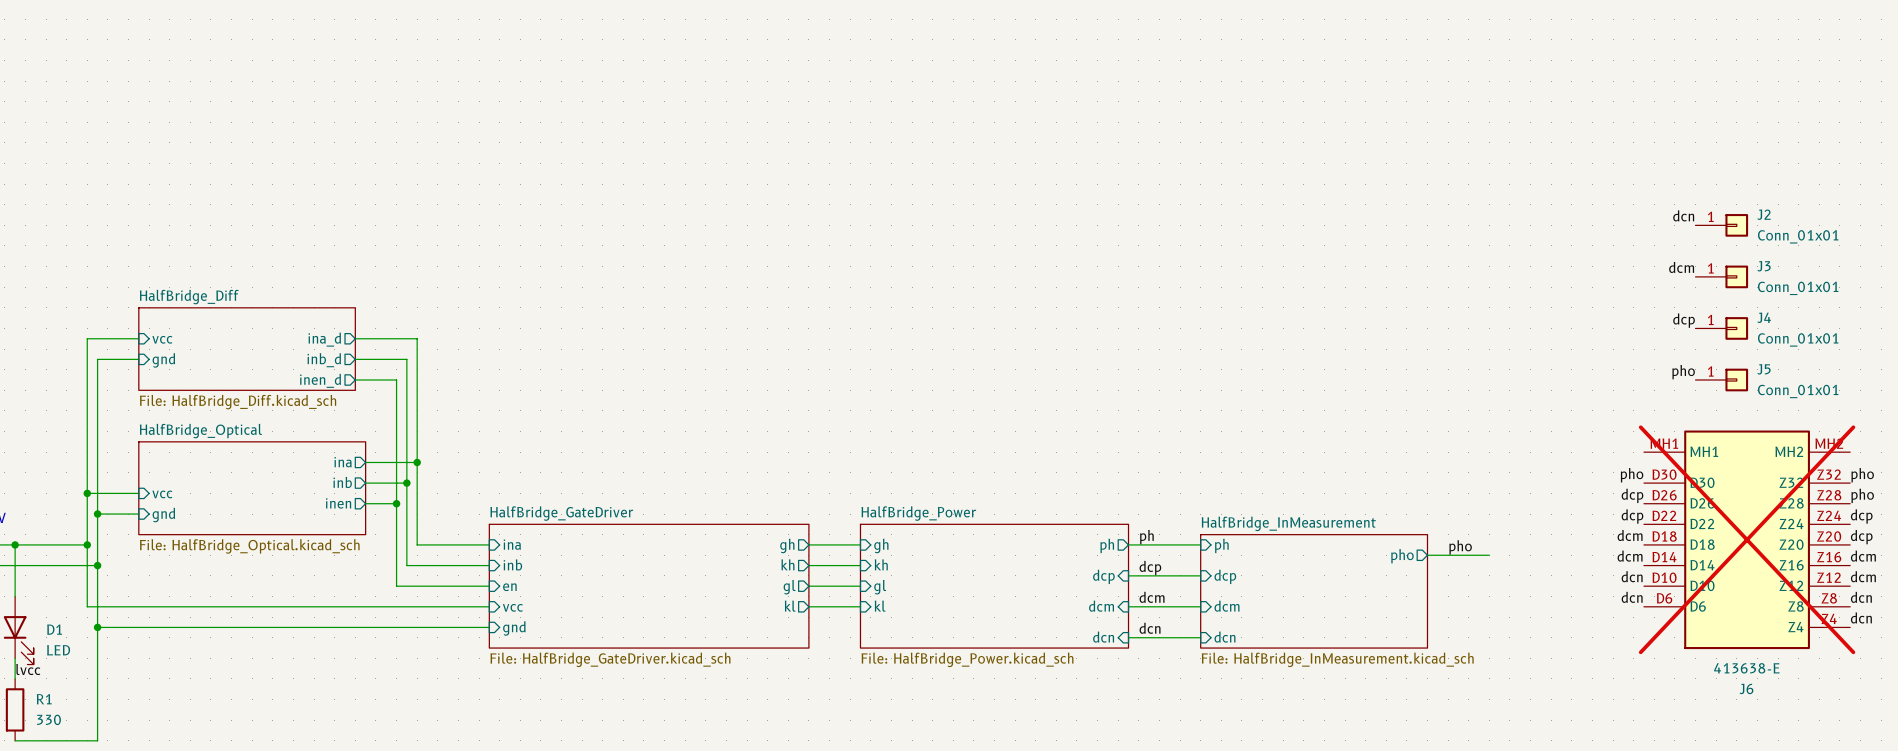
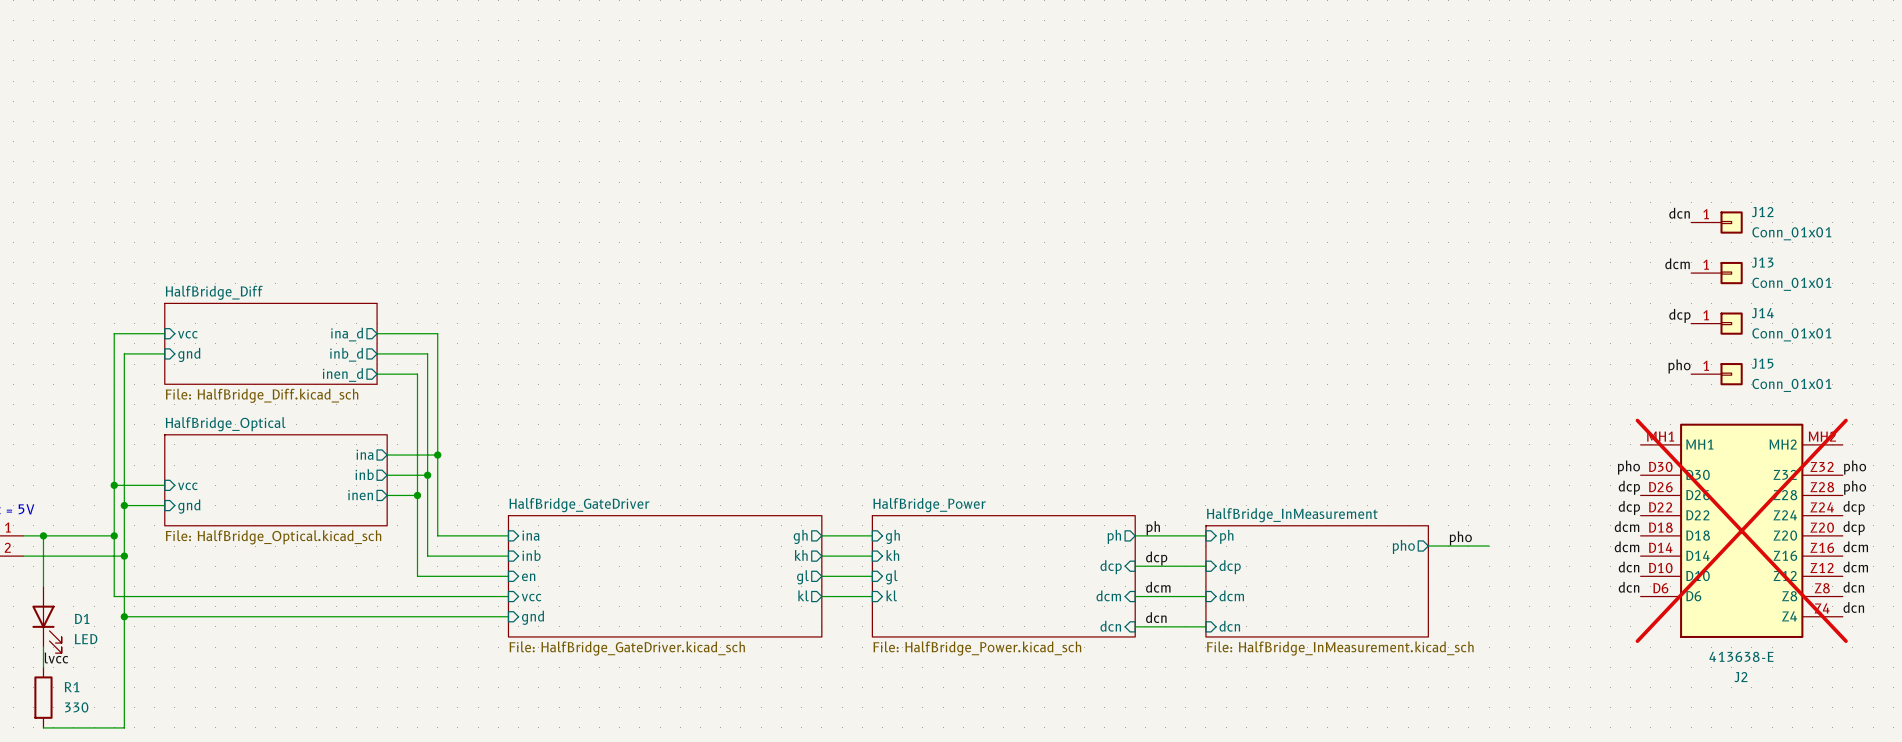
J2 name: J2 (1764, 214) -> J12 (1762, 212)
J3 name: J3 (1764, 266) -> J13 (1762, 262)
J4 name: J4 (1764, 317) -> J14 (1762, 313)
J5 name: J5 (1763, 369) -> J15 (1762, 363)
J6 name: J6 (1746, 688) -> J2 (1740, 677)

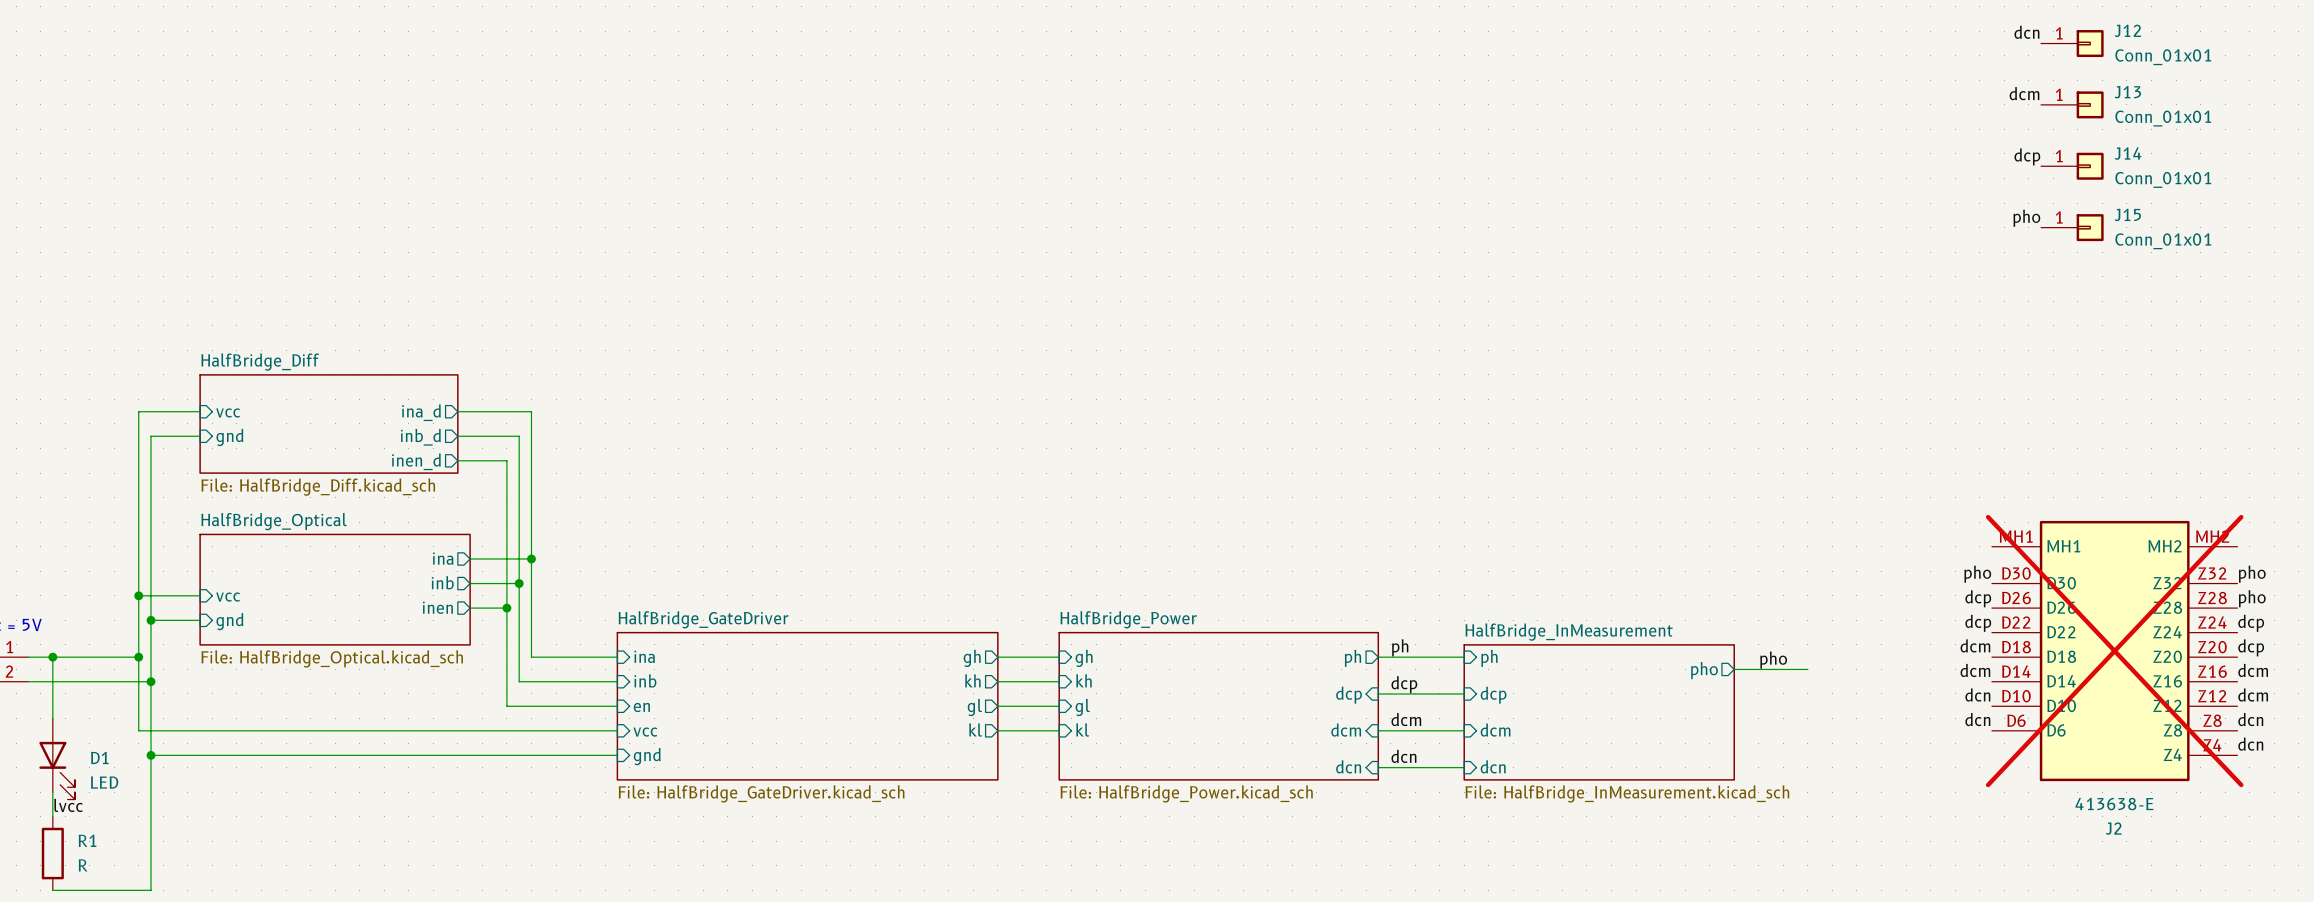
label position: dcn (1679, 213) -> dcn (2026, 32)
J12 position: (1716, 222) -> (2072, 43)
label position: dcm (1677, 263) -> dcm (2024, 93)
J13 position: (1716, 273) -> (2072, 104)
label position: dcp (1679, 315) -> dcp (2027, 156)
J14 position: (1716, 323) -> (2072, 166)
label position: pho (1679, 366) -> pho (2026, 218)
J15 position: (1716, 374) -> (2072, 227)
R1 value: 330 (76, 707) -> R (82, 865)

